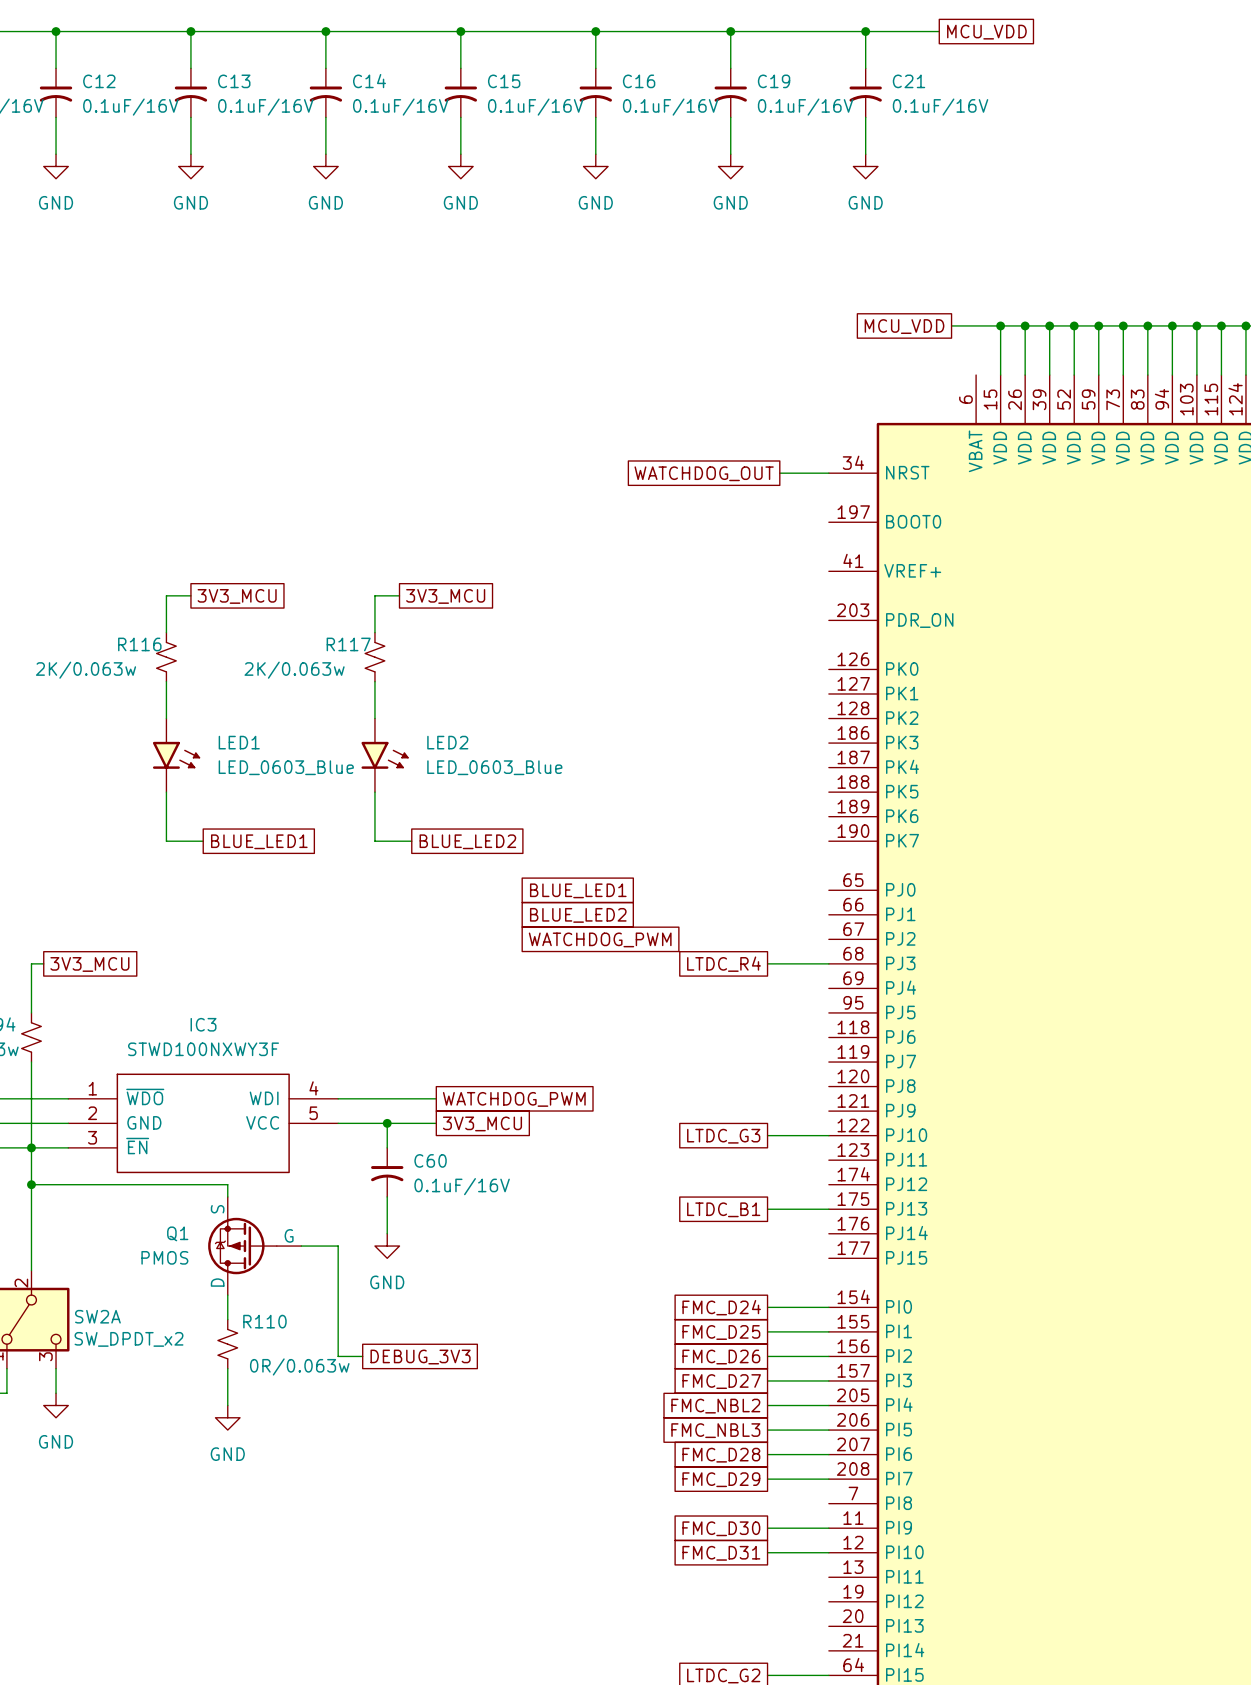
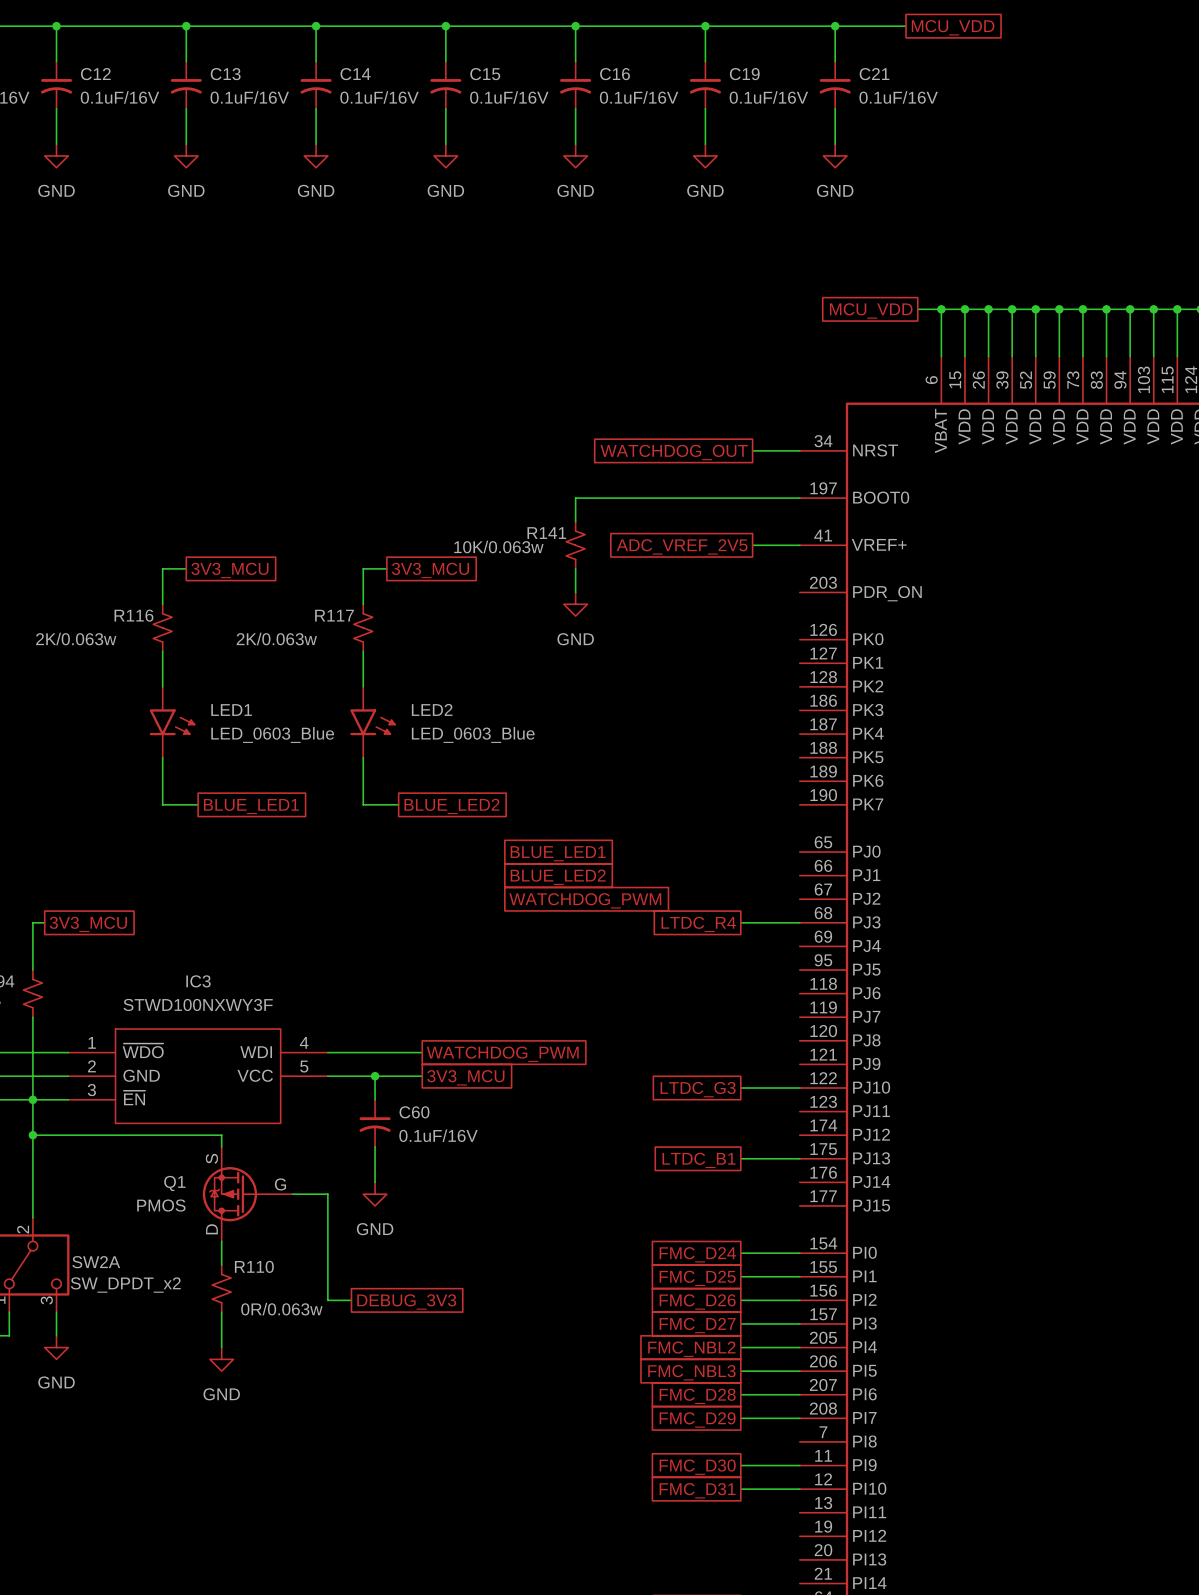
wire: none -> (941, 309) (941, 356)
junction: none -> (941, 309)
wire: none -> (799, 498) (575, 498) (575, 521)
R141: none -> 10K/0.063w (575, 545)
global label: none -> ADC_VREF_2V5 (682, 546)
wire: none -> (752, 545) (799, 545)
wire: none -> (575, 568) (575, 592)
power symbol: none -> GND (575, 604)

